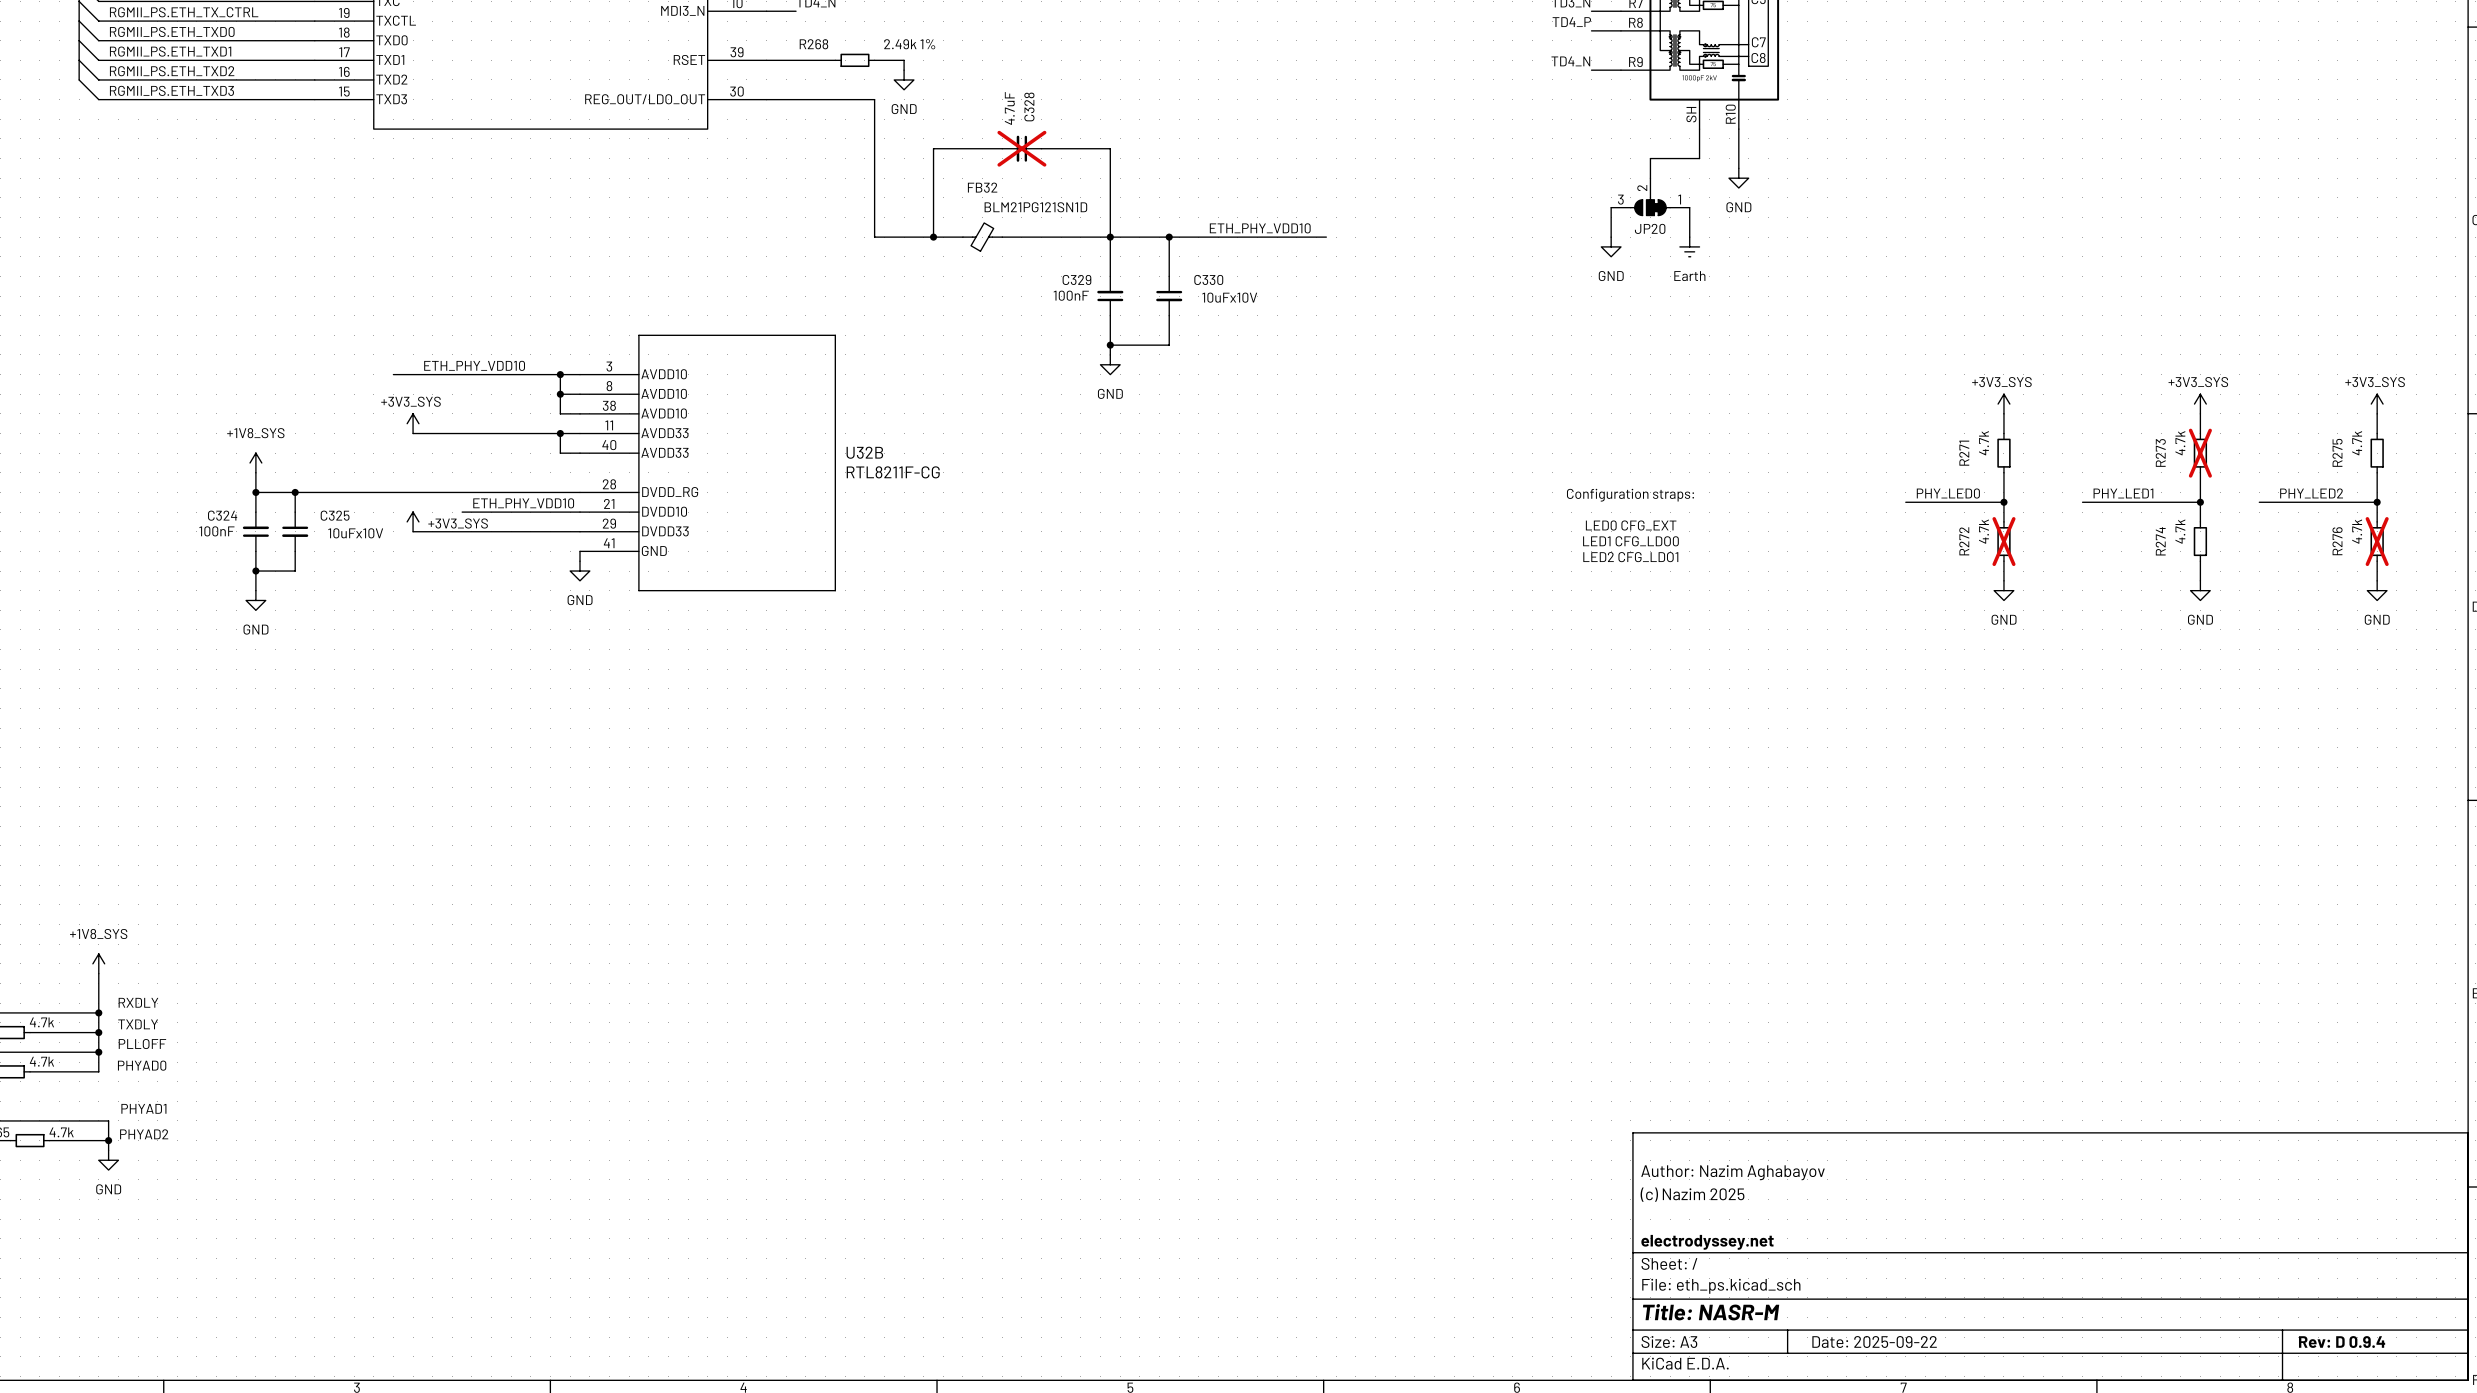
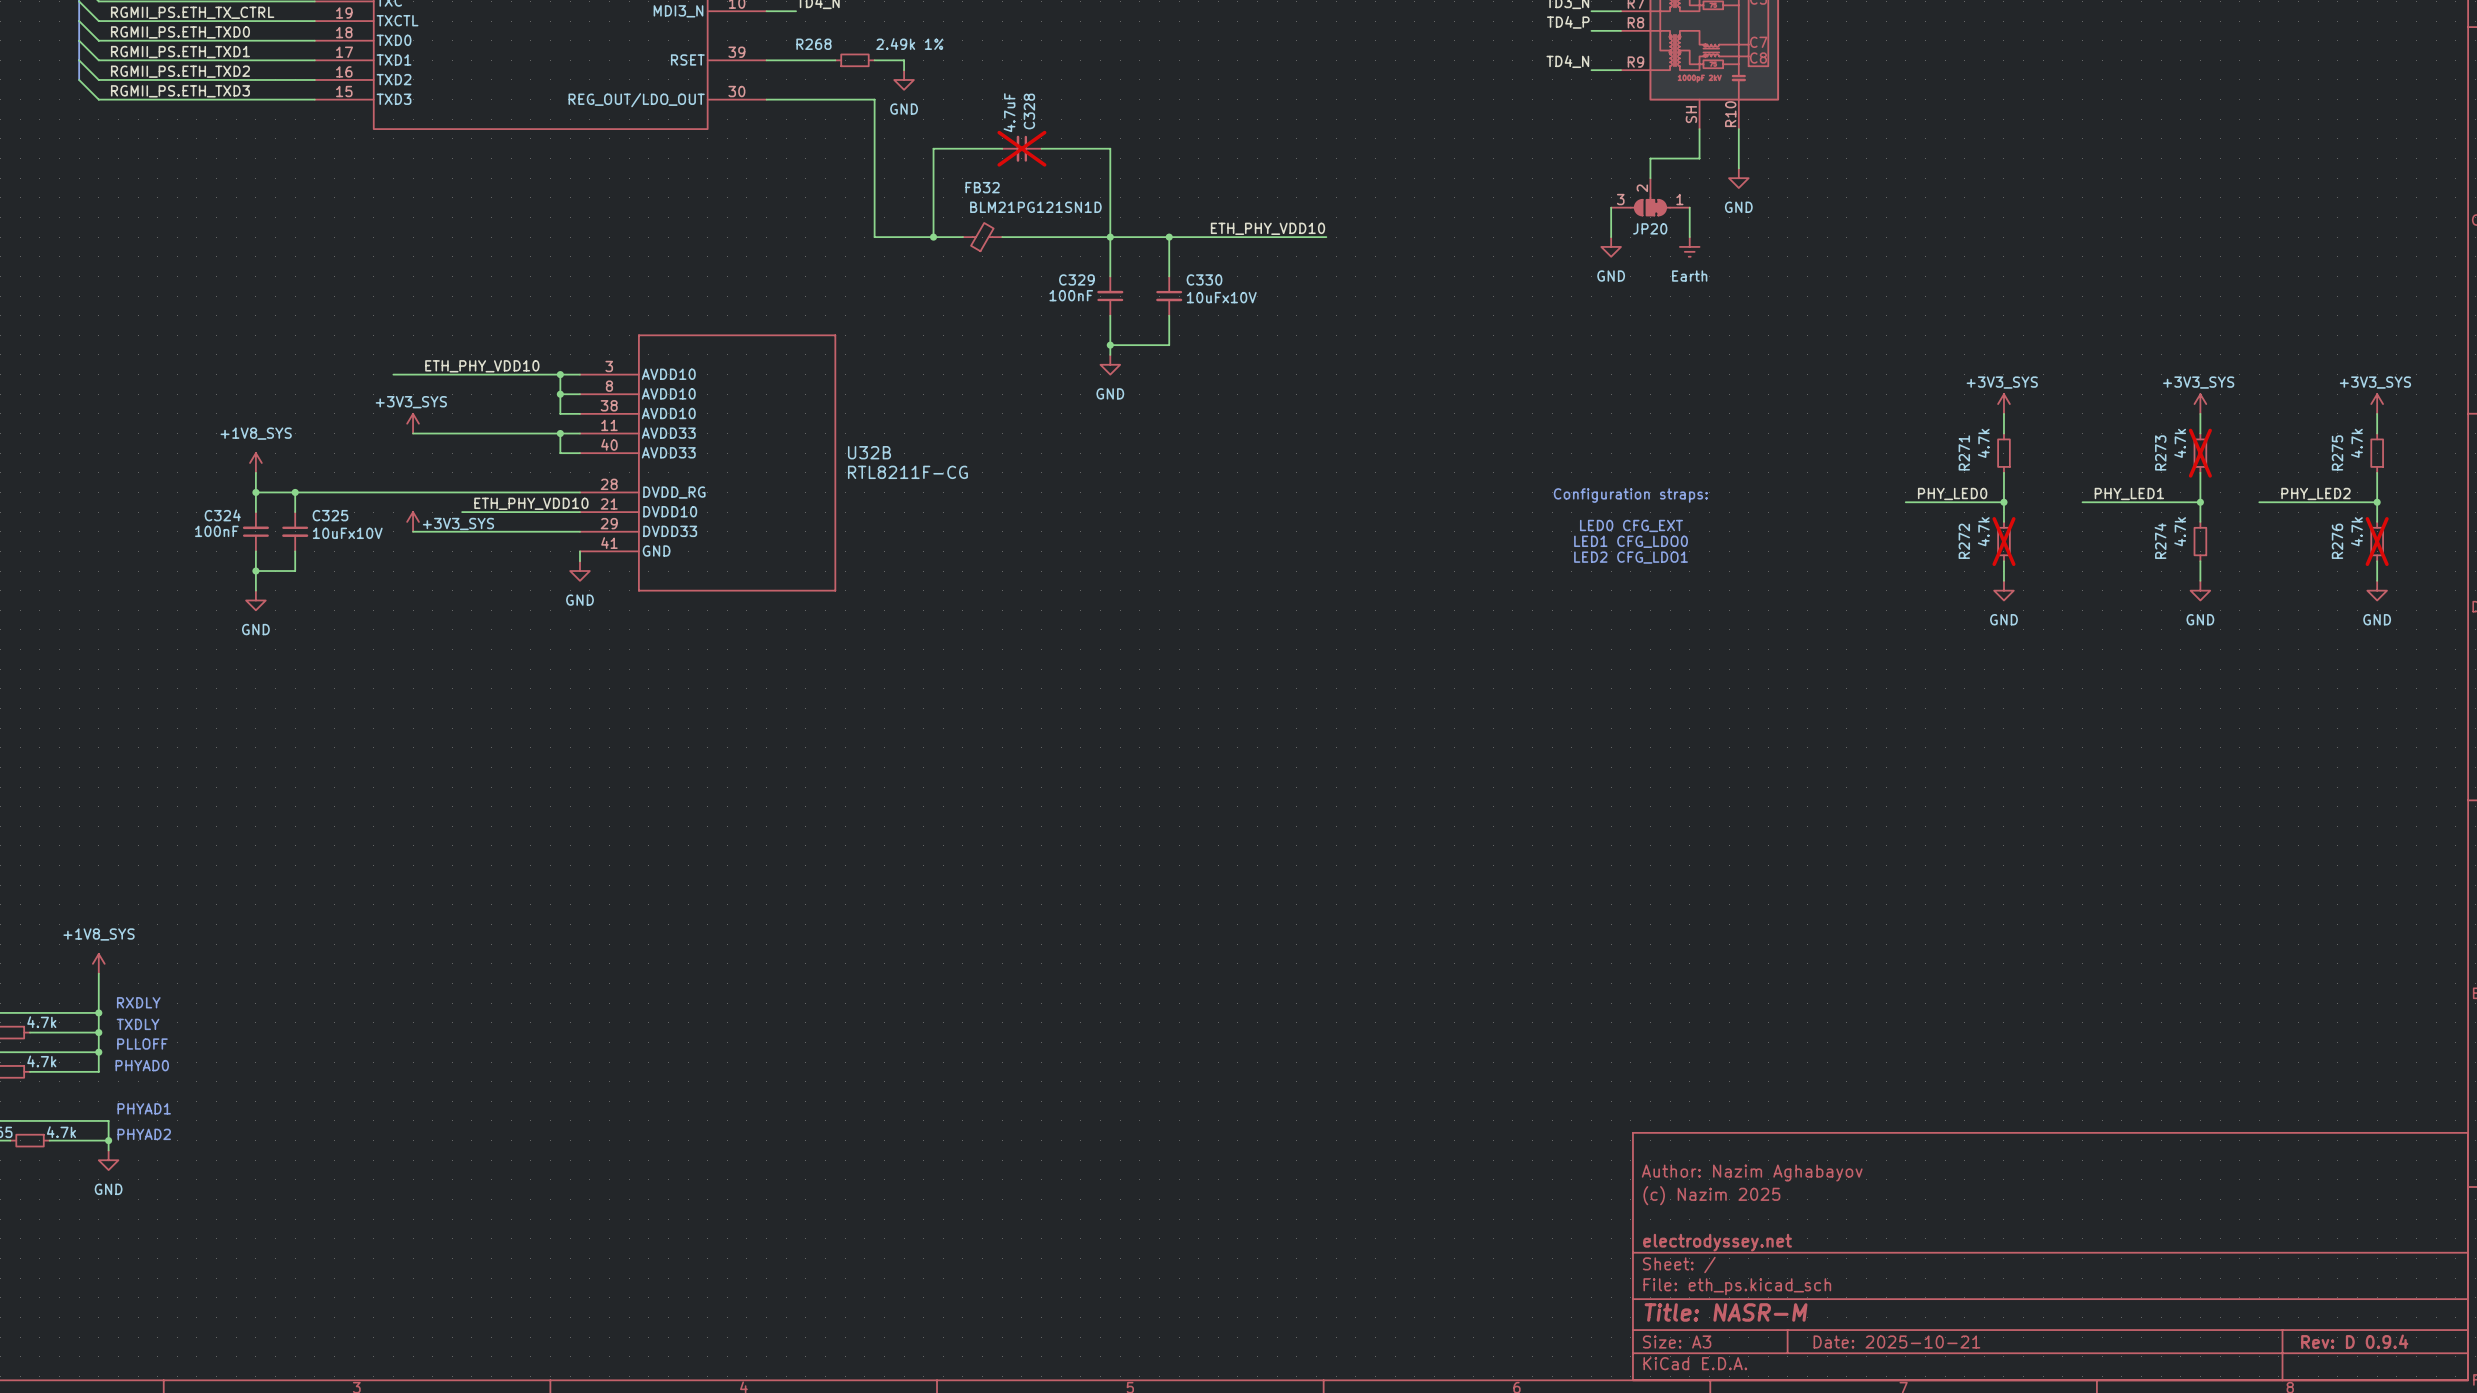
title block: Date: 2025-09-22 (1874, 1342) -> Date: 2025-10-21 (1896, 1342)

